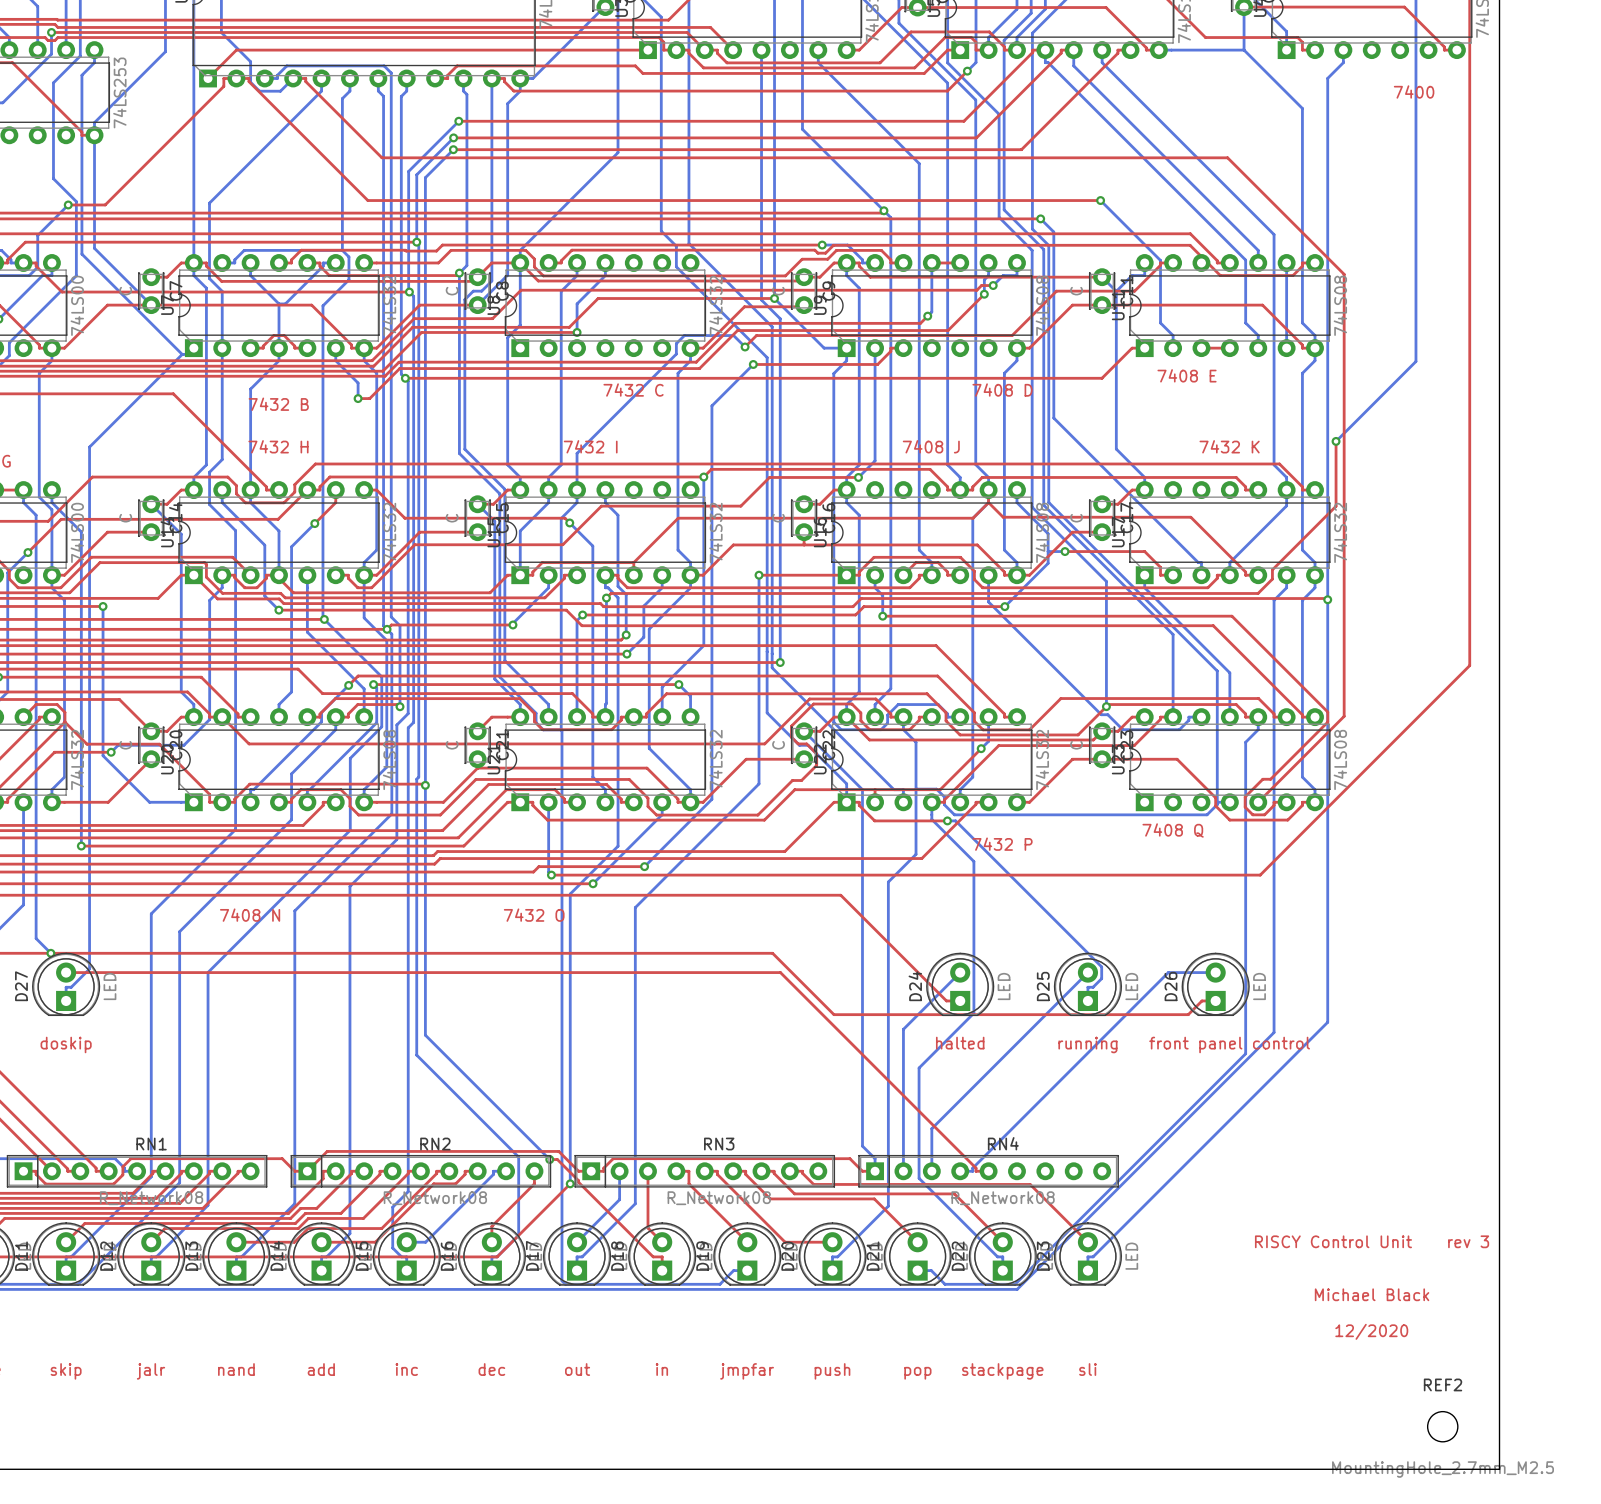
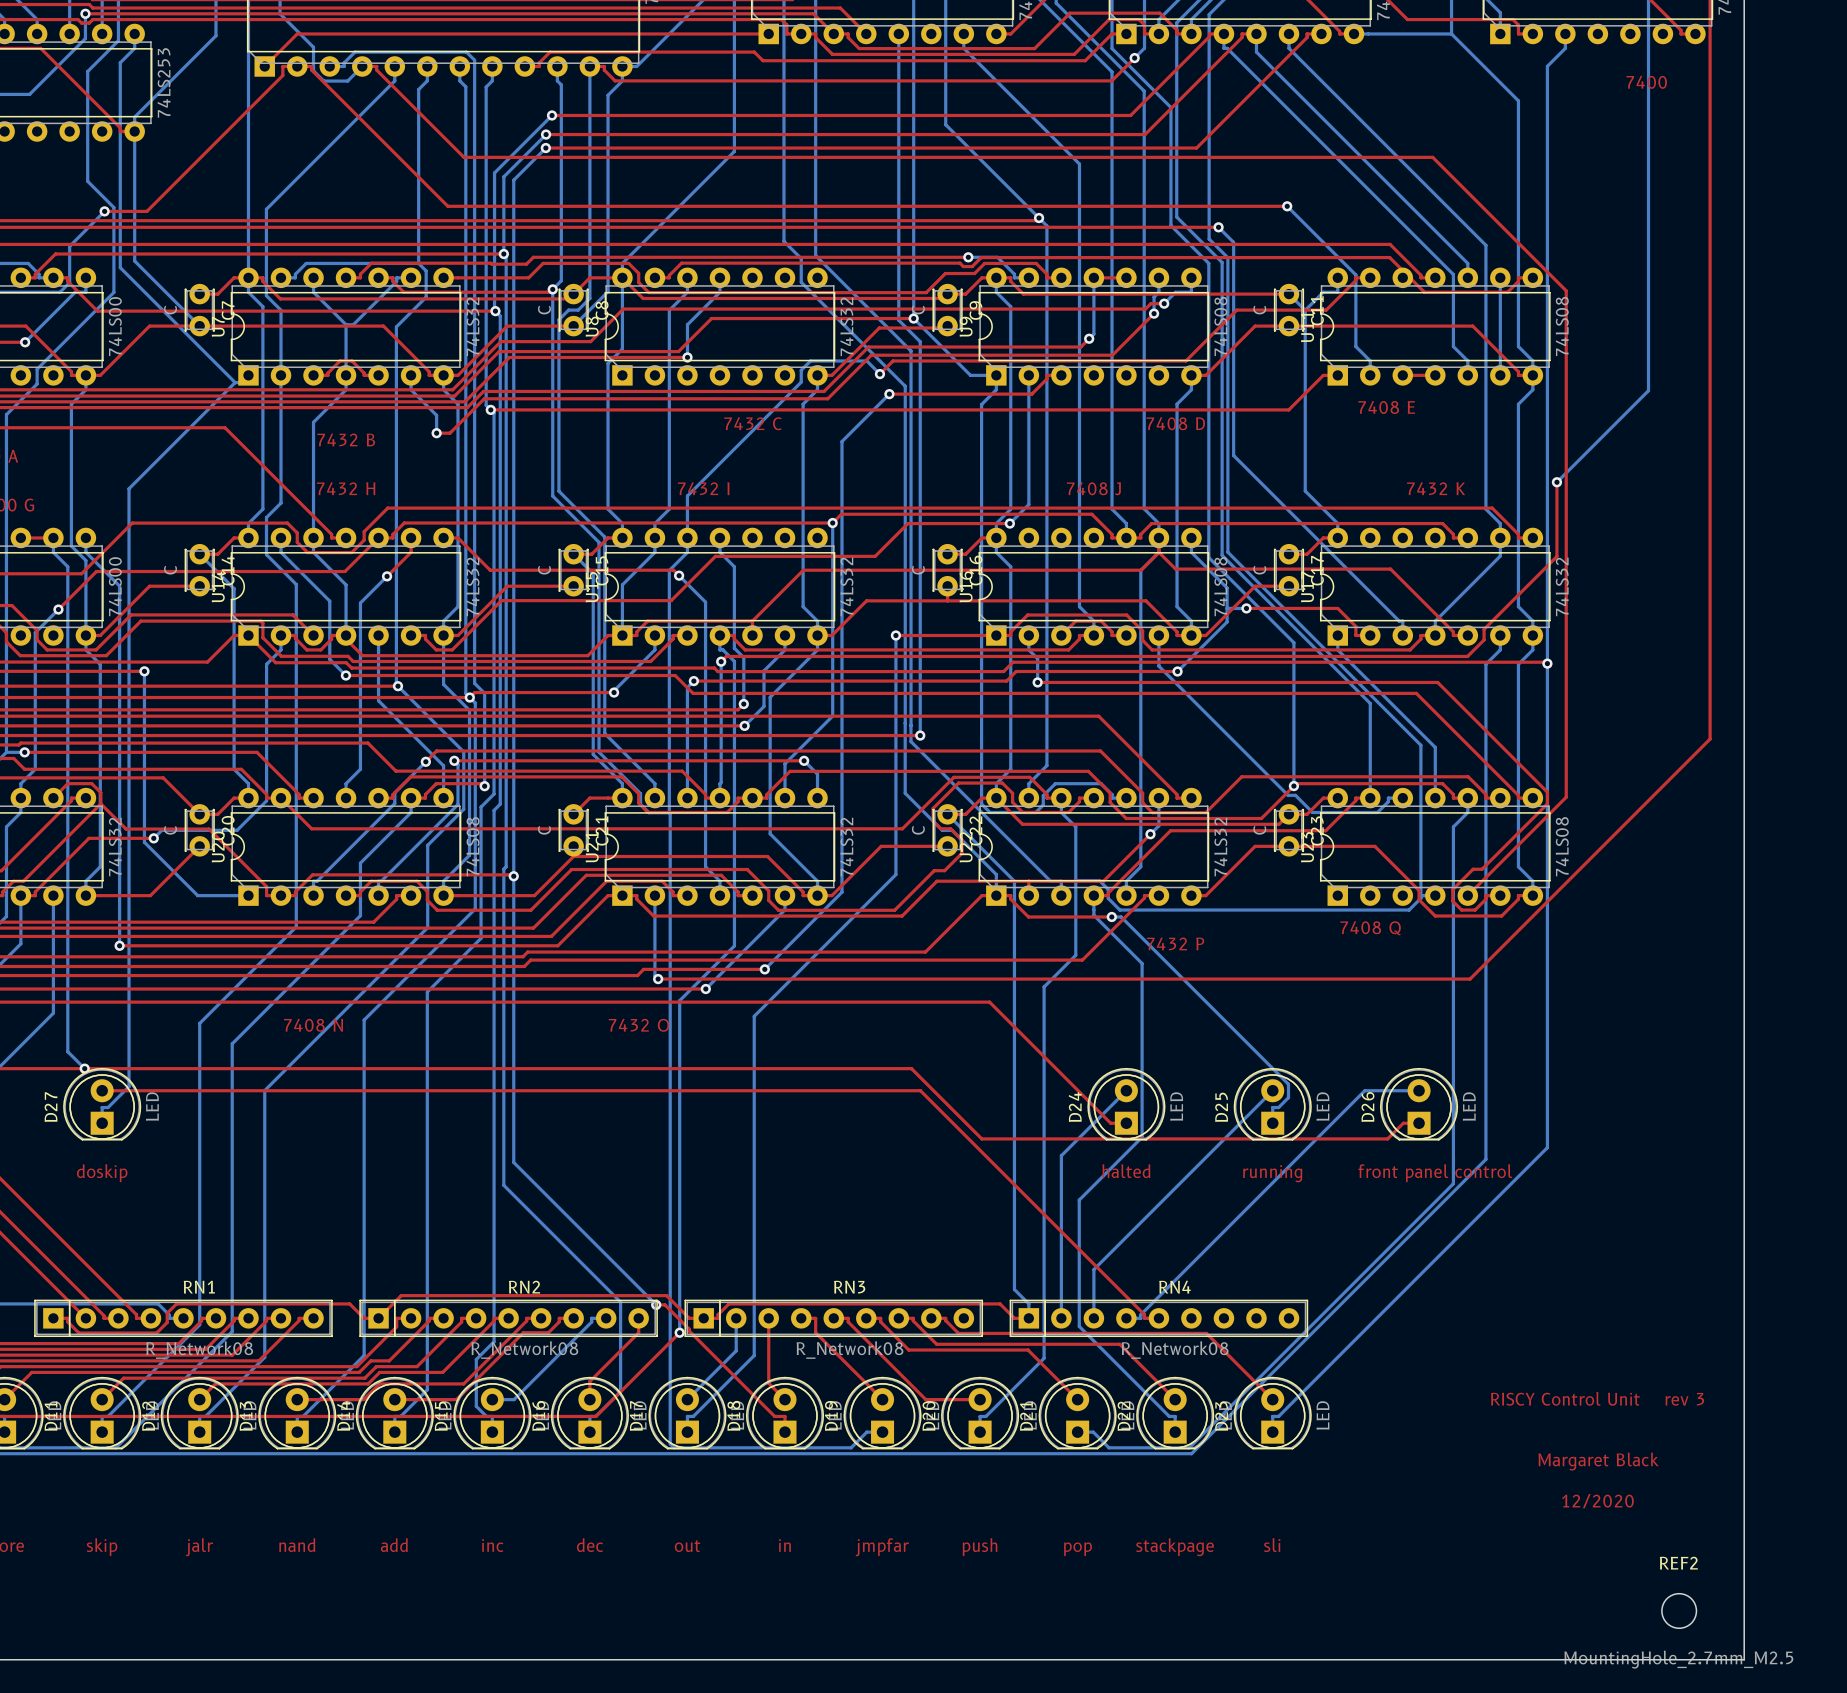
text: Michael Black (1372, 1294) -> Margaret Black (1598, 1461)

